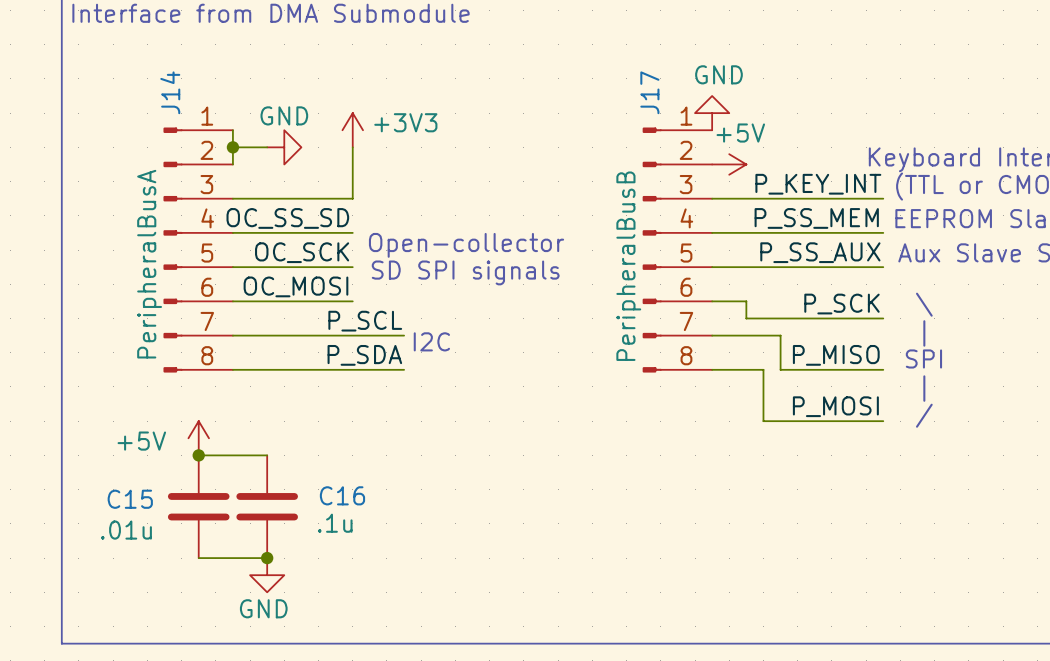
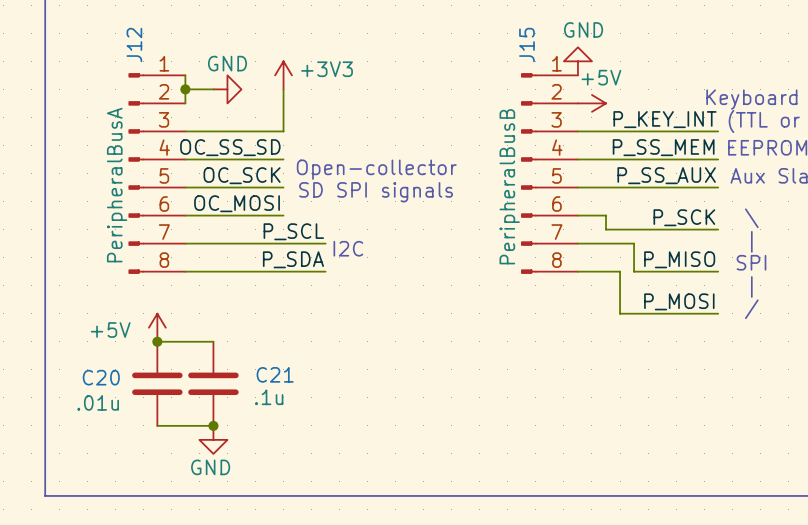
J14 name: J14 (170, 92) -> J12 (134, 45)
J17 name: J17 (649, 92) -> J15 (526, 45)
C16 name: C16 (342, 495) -> C21 (275, 374)
C15 name: C15 (130, 499) -> C20 (101, 377)

